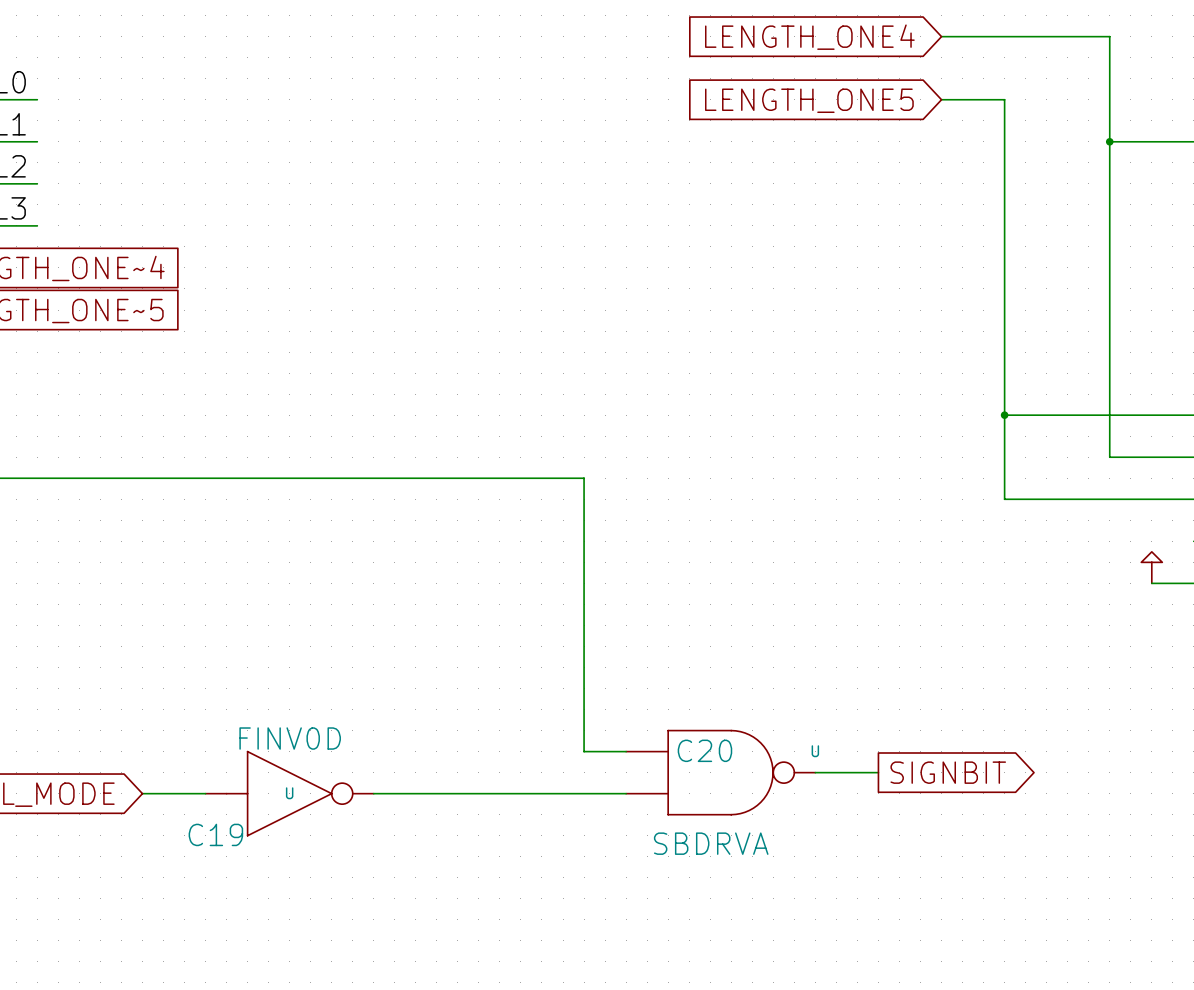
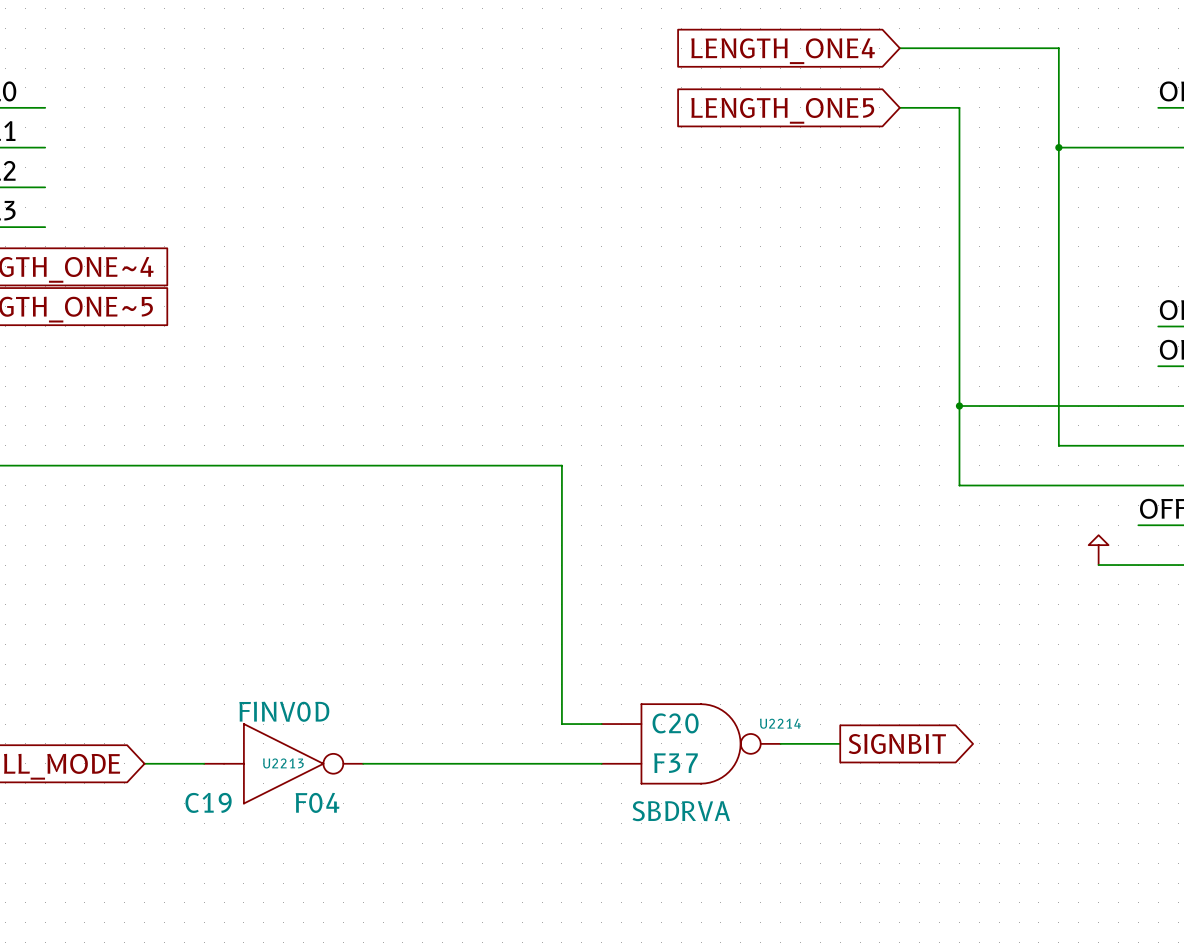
U name: U (815, 751) -> U2214 (780, 723)
U value: none -> F37 (675, 763)
U name: U (289, 793) -> U2213 (283, 763)
U value: none -> F04 (317, 802)

